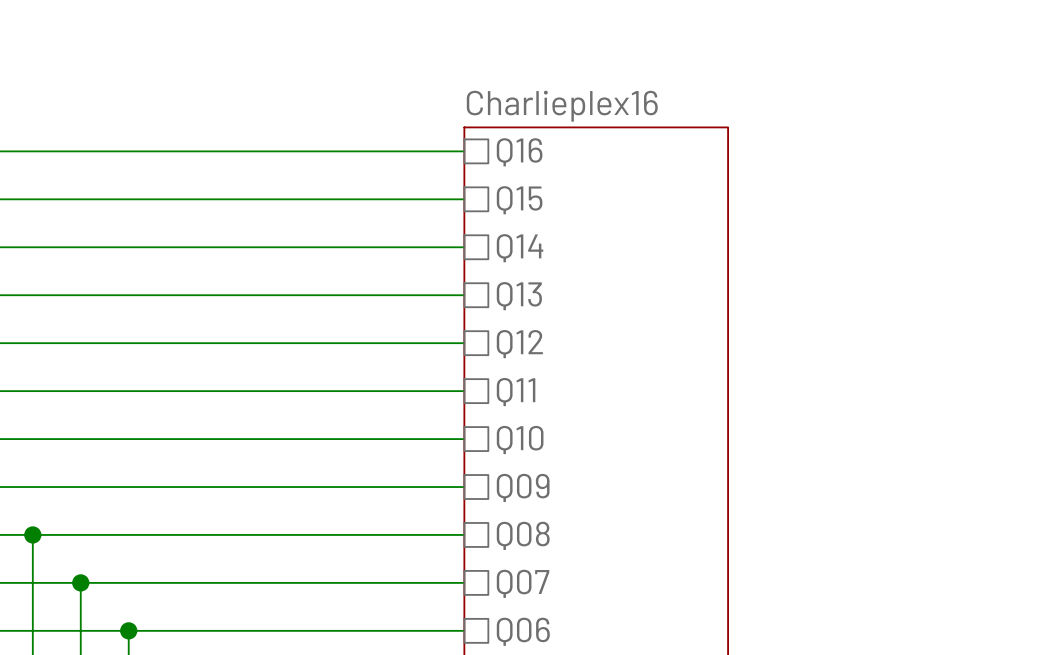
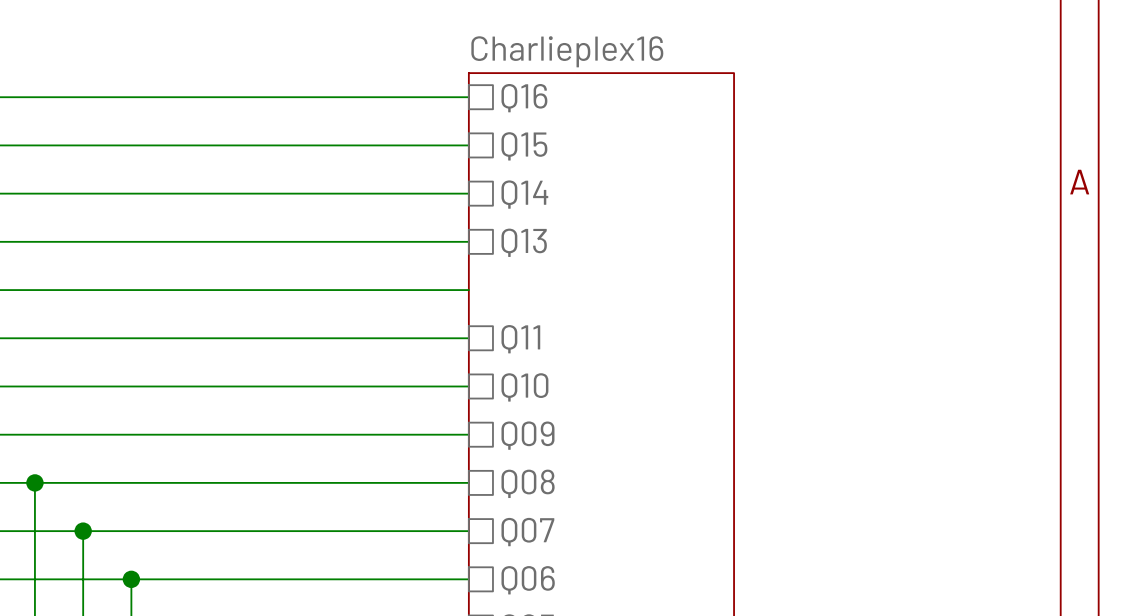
sheet pin: Q12 (519, 344) -> none

